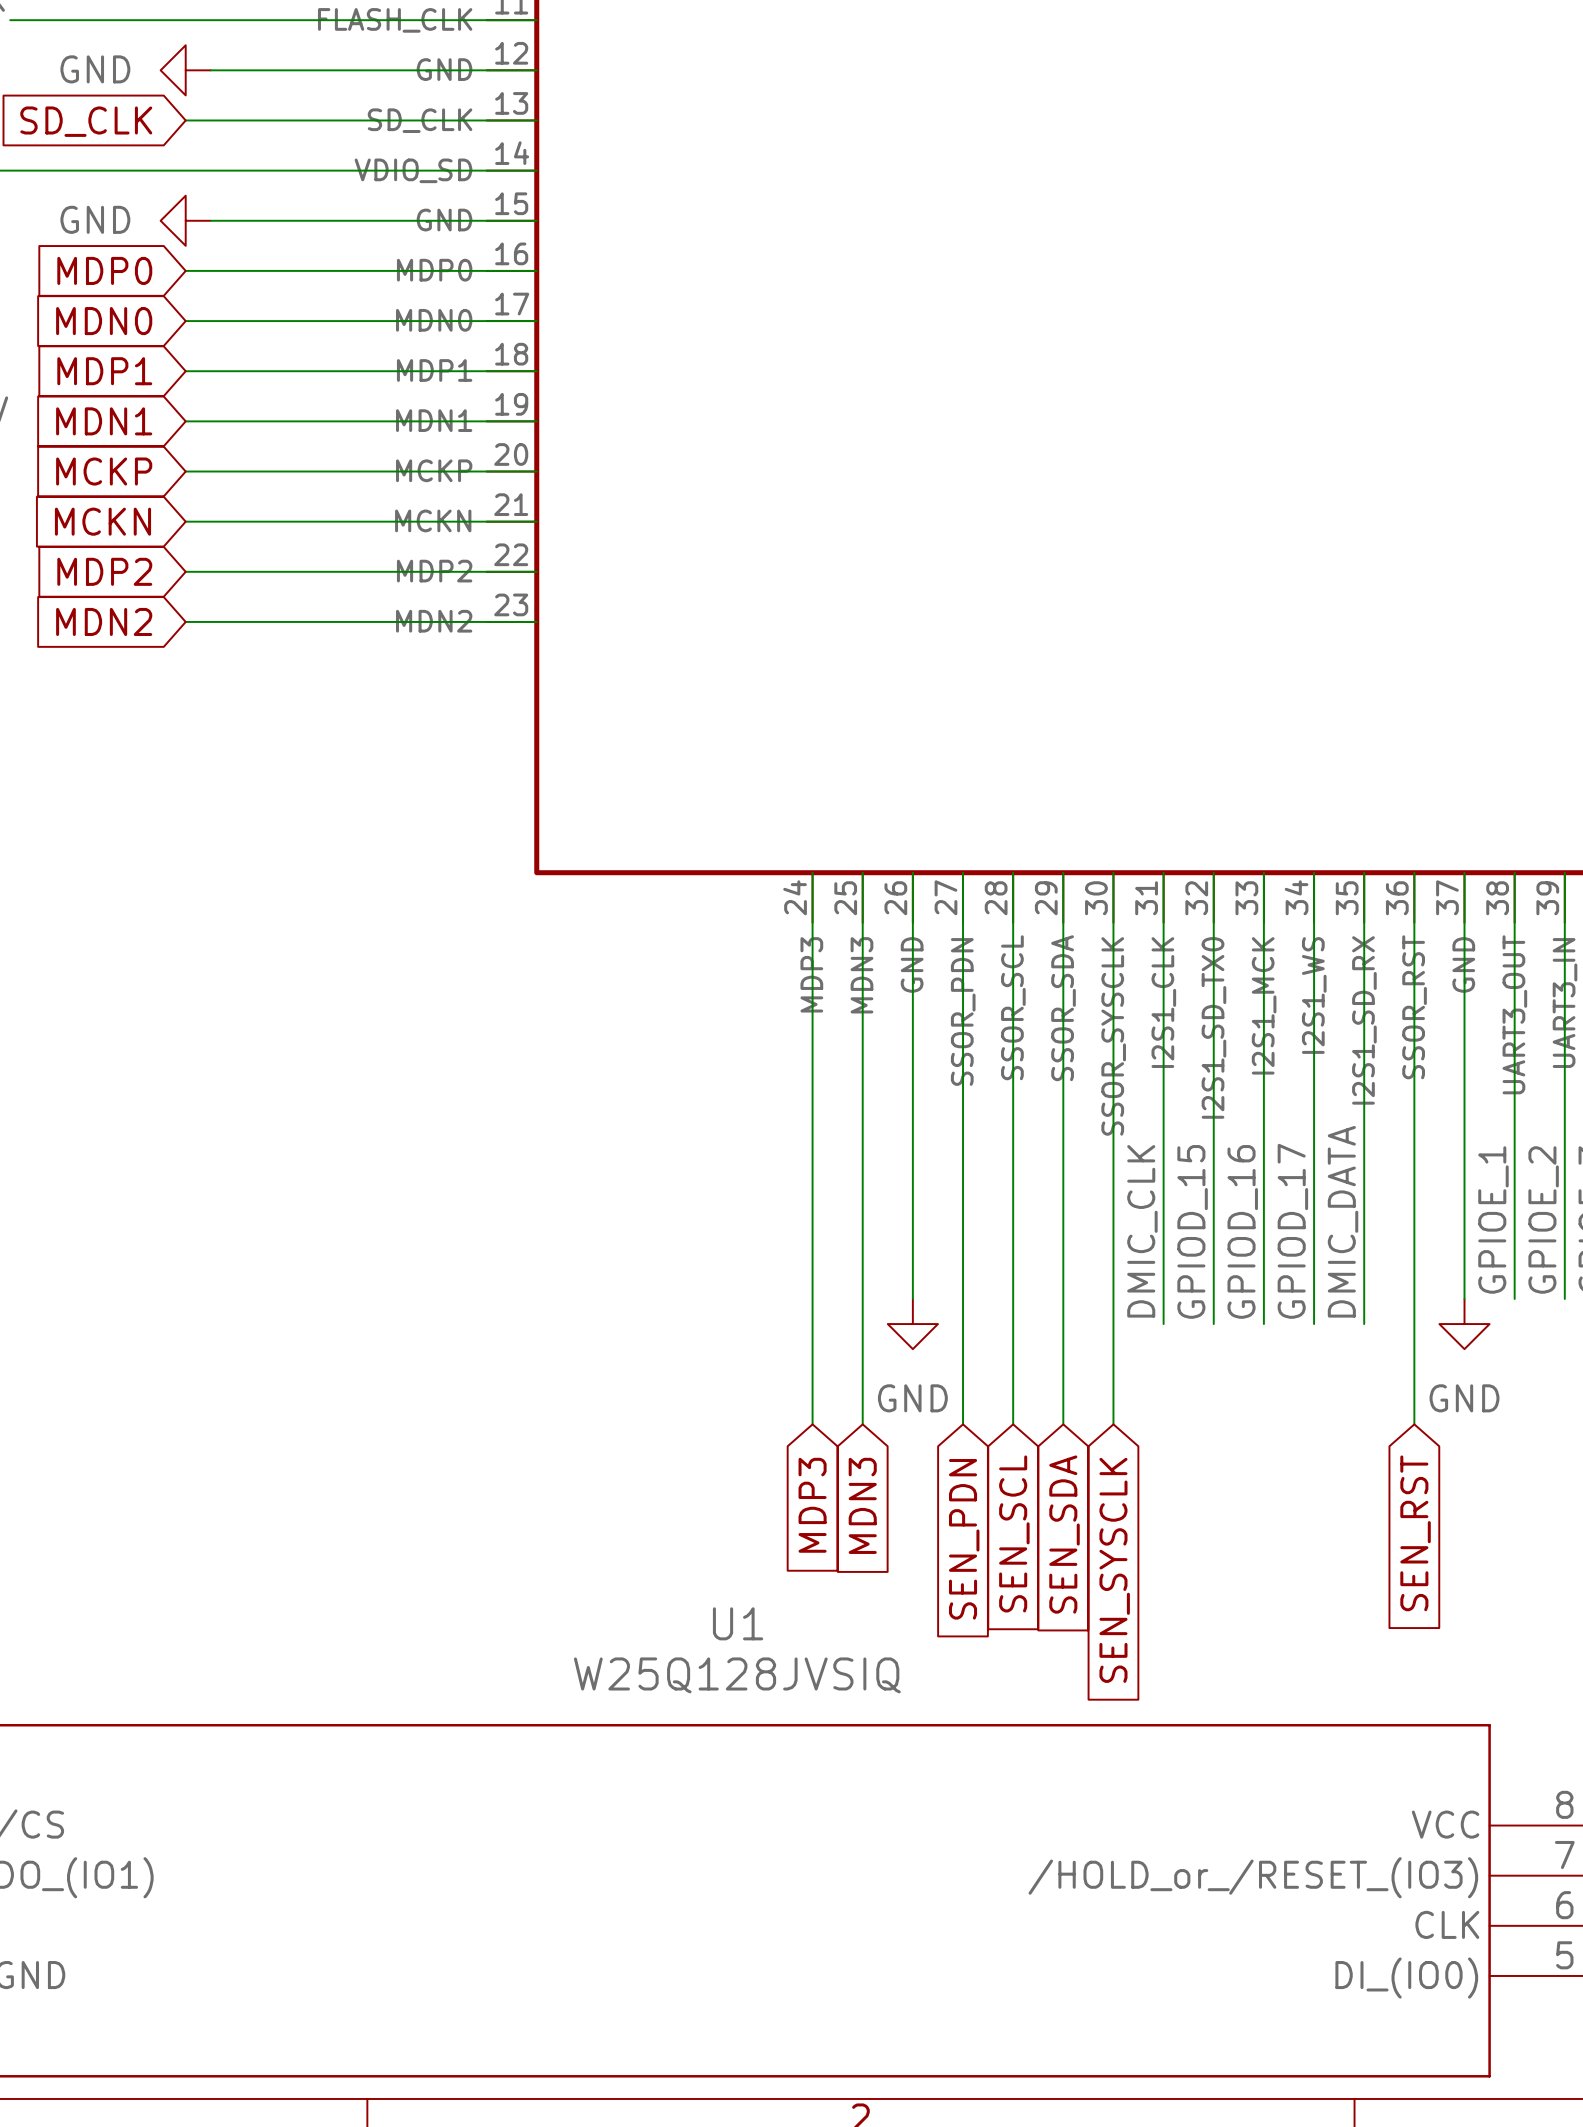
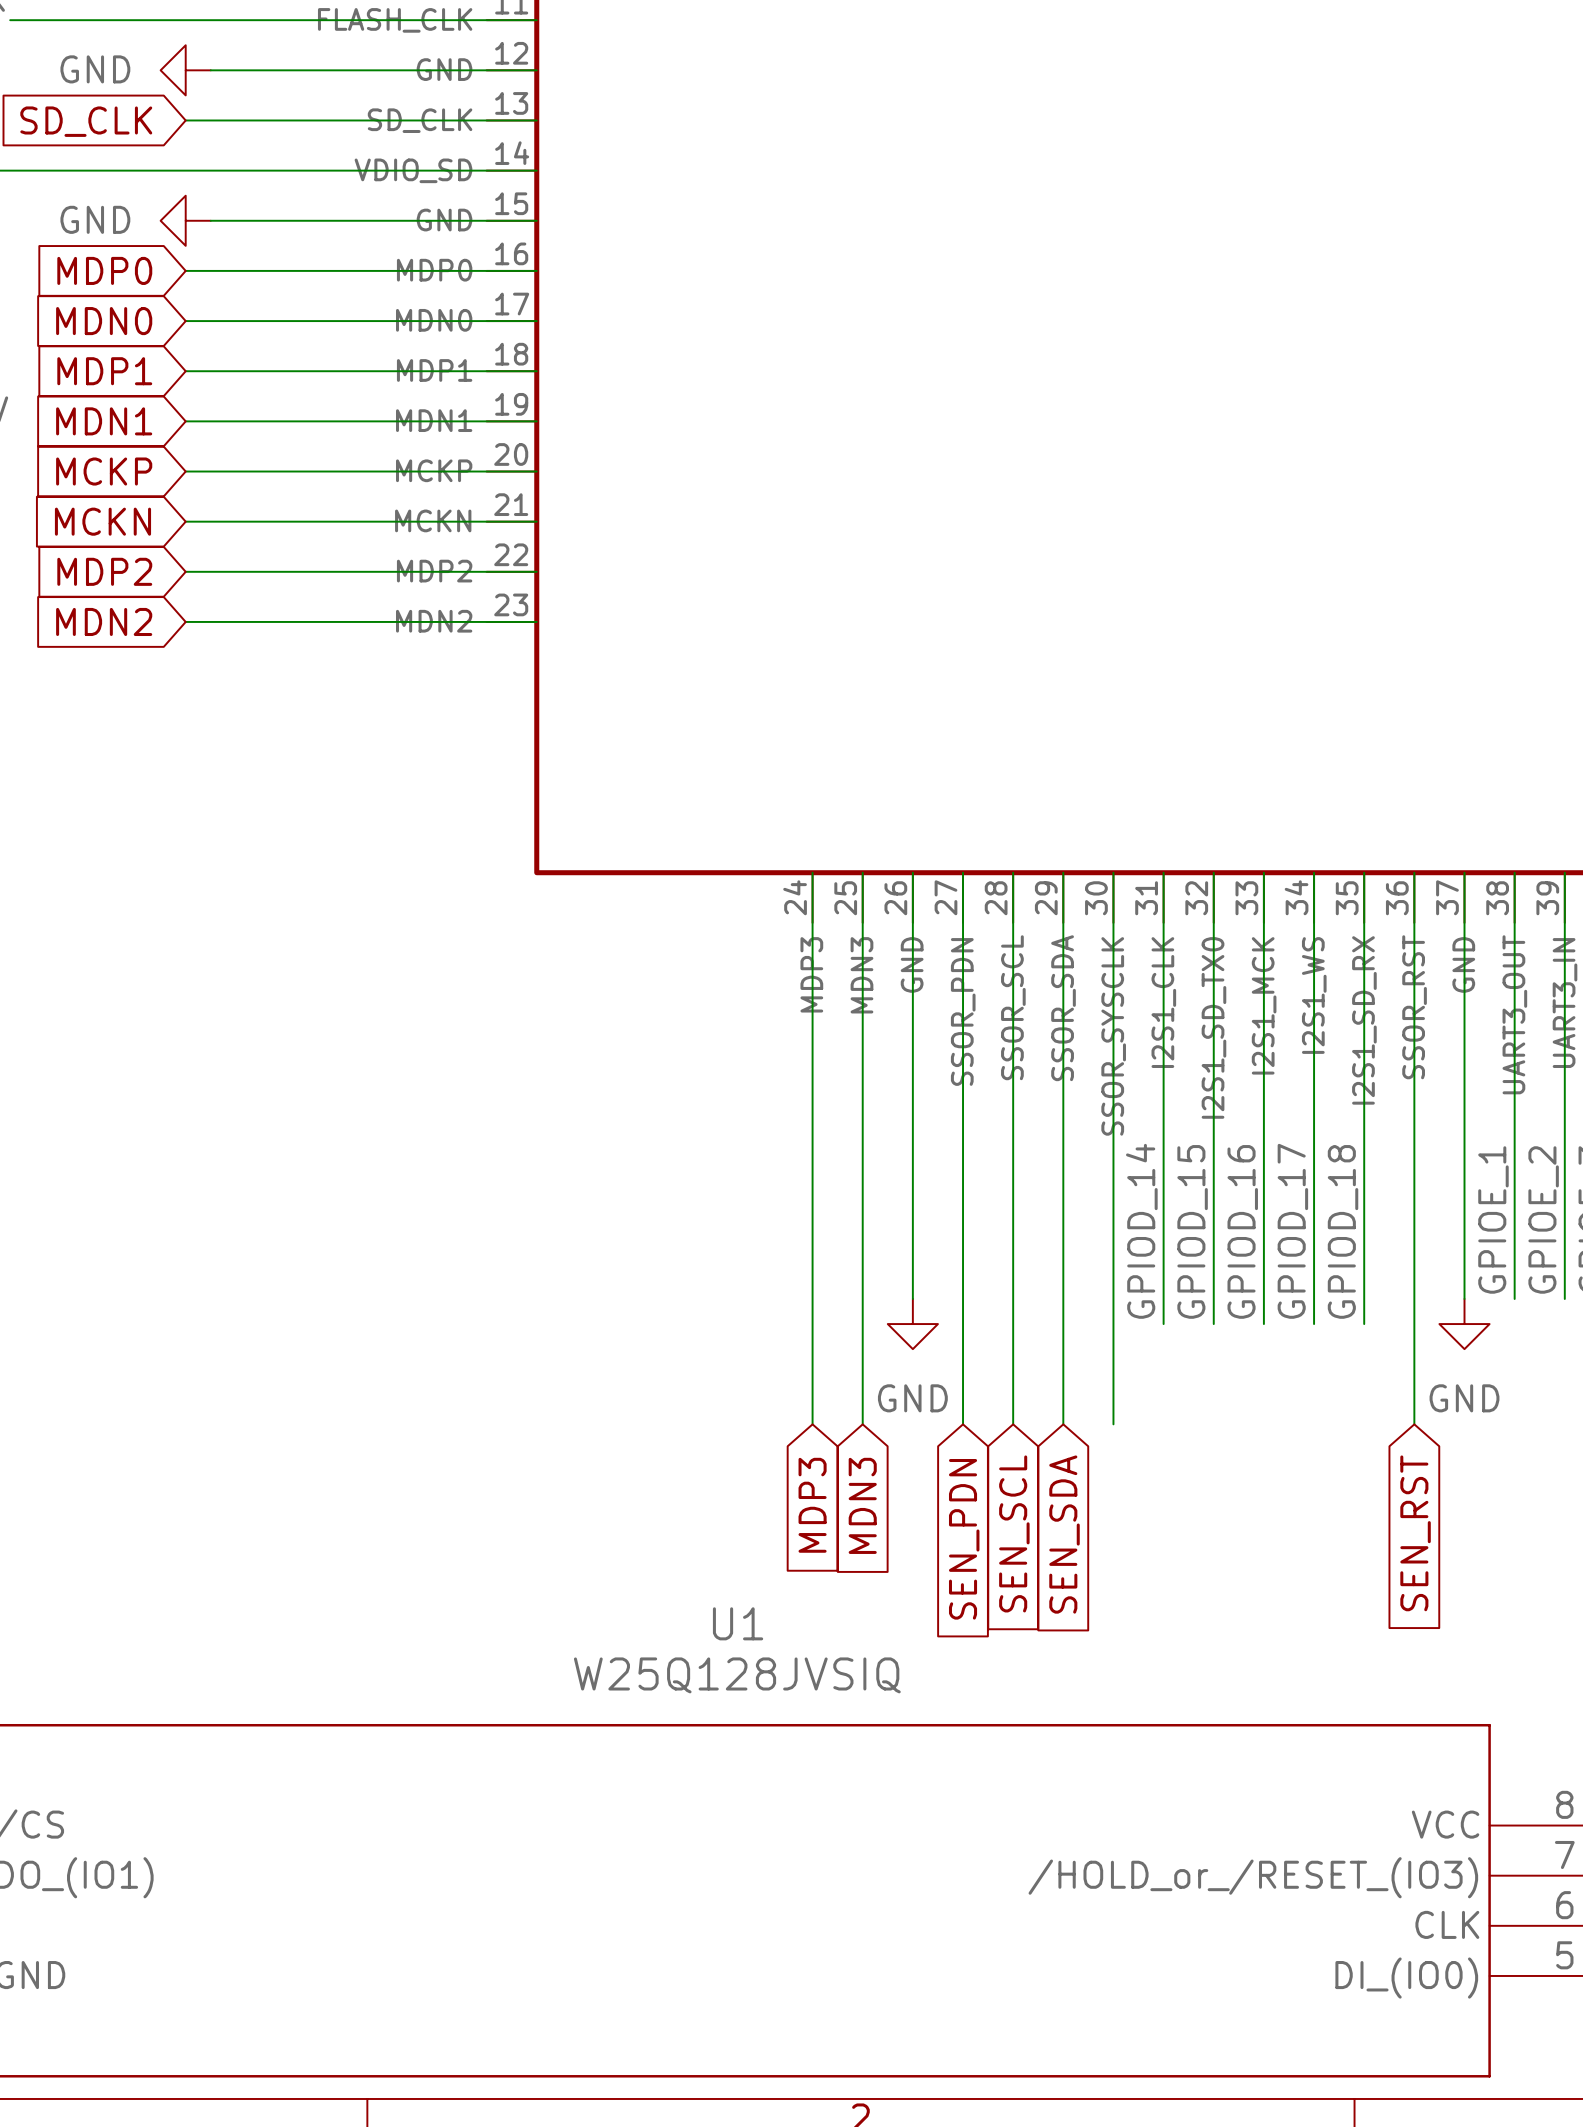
label: DMIC_DATA (1343, 1221) -> GPIOD_18 (1343, 1231)
label: DMIC_CLK (1142, 1231) -> GPIOD_14 (1141, 1231)
global label: SEN_SYSCLK (1114, 1570) -> none

